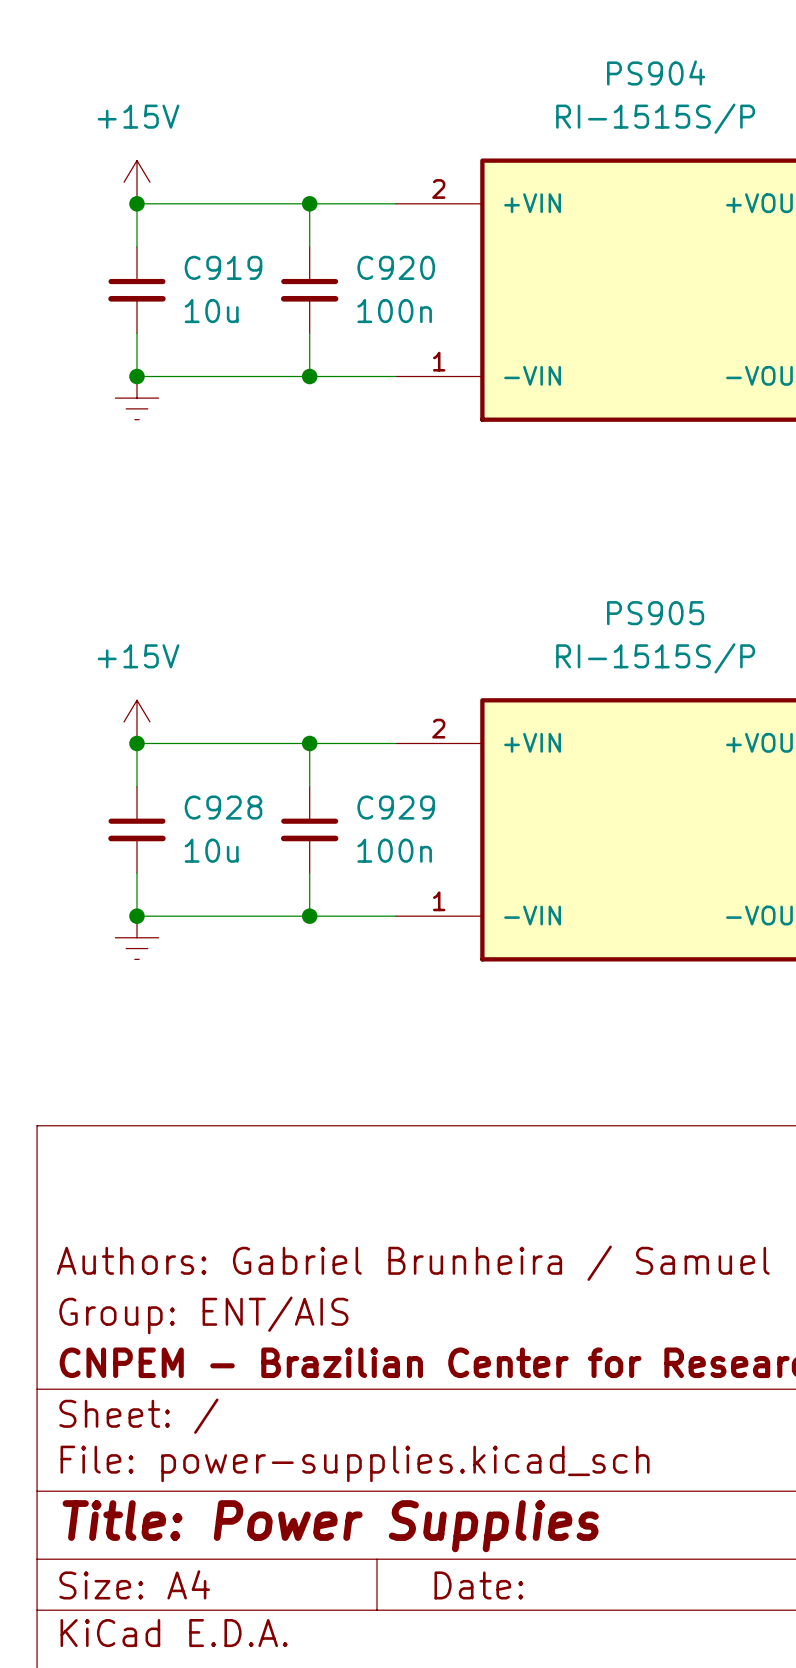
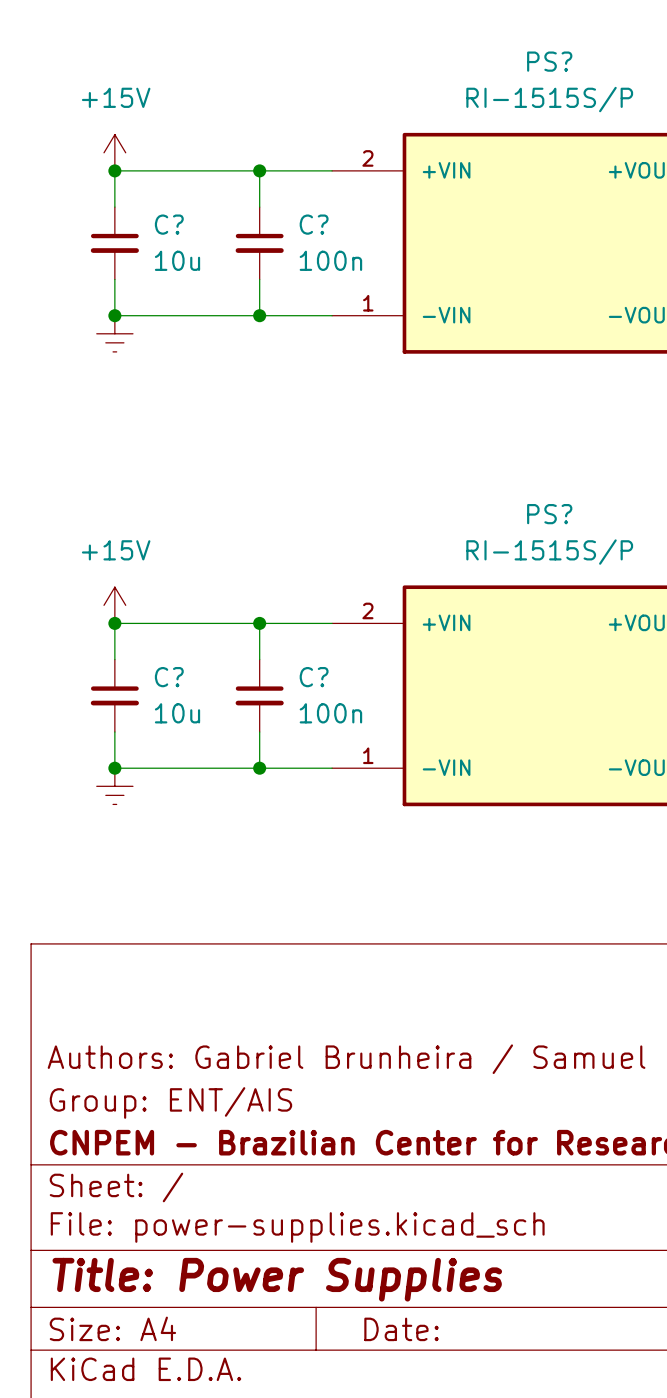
PS904 name: PS904 (656, 72) -> PS? (549, 61)
C919 name: C919 (223, 267) -> C? (169, 224)
C920 name: C920 (396, 267) -> C? (314, 224)
PS905 name: PS905 (655, 613) -> PS? (549, 514)
C928 name: C928 (223, 807) -> C? (169, 677)
C929 name: C929 (396, 807) -> C? (314, 677)

